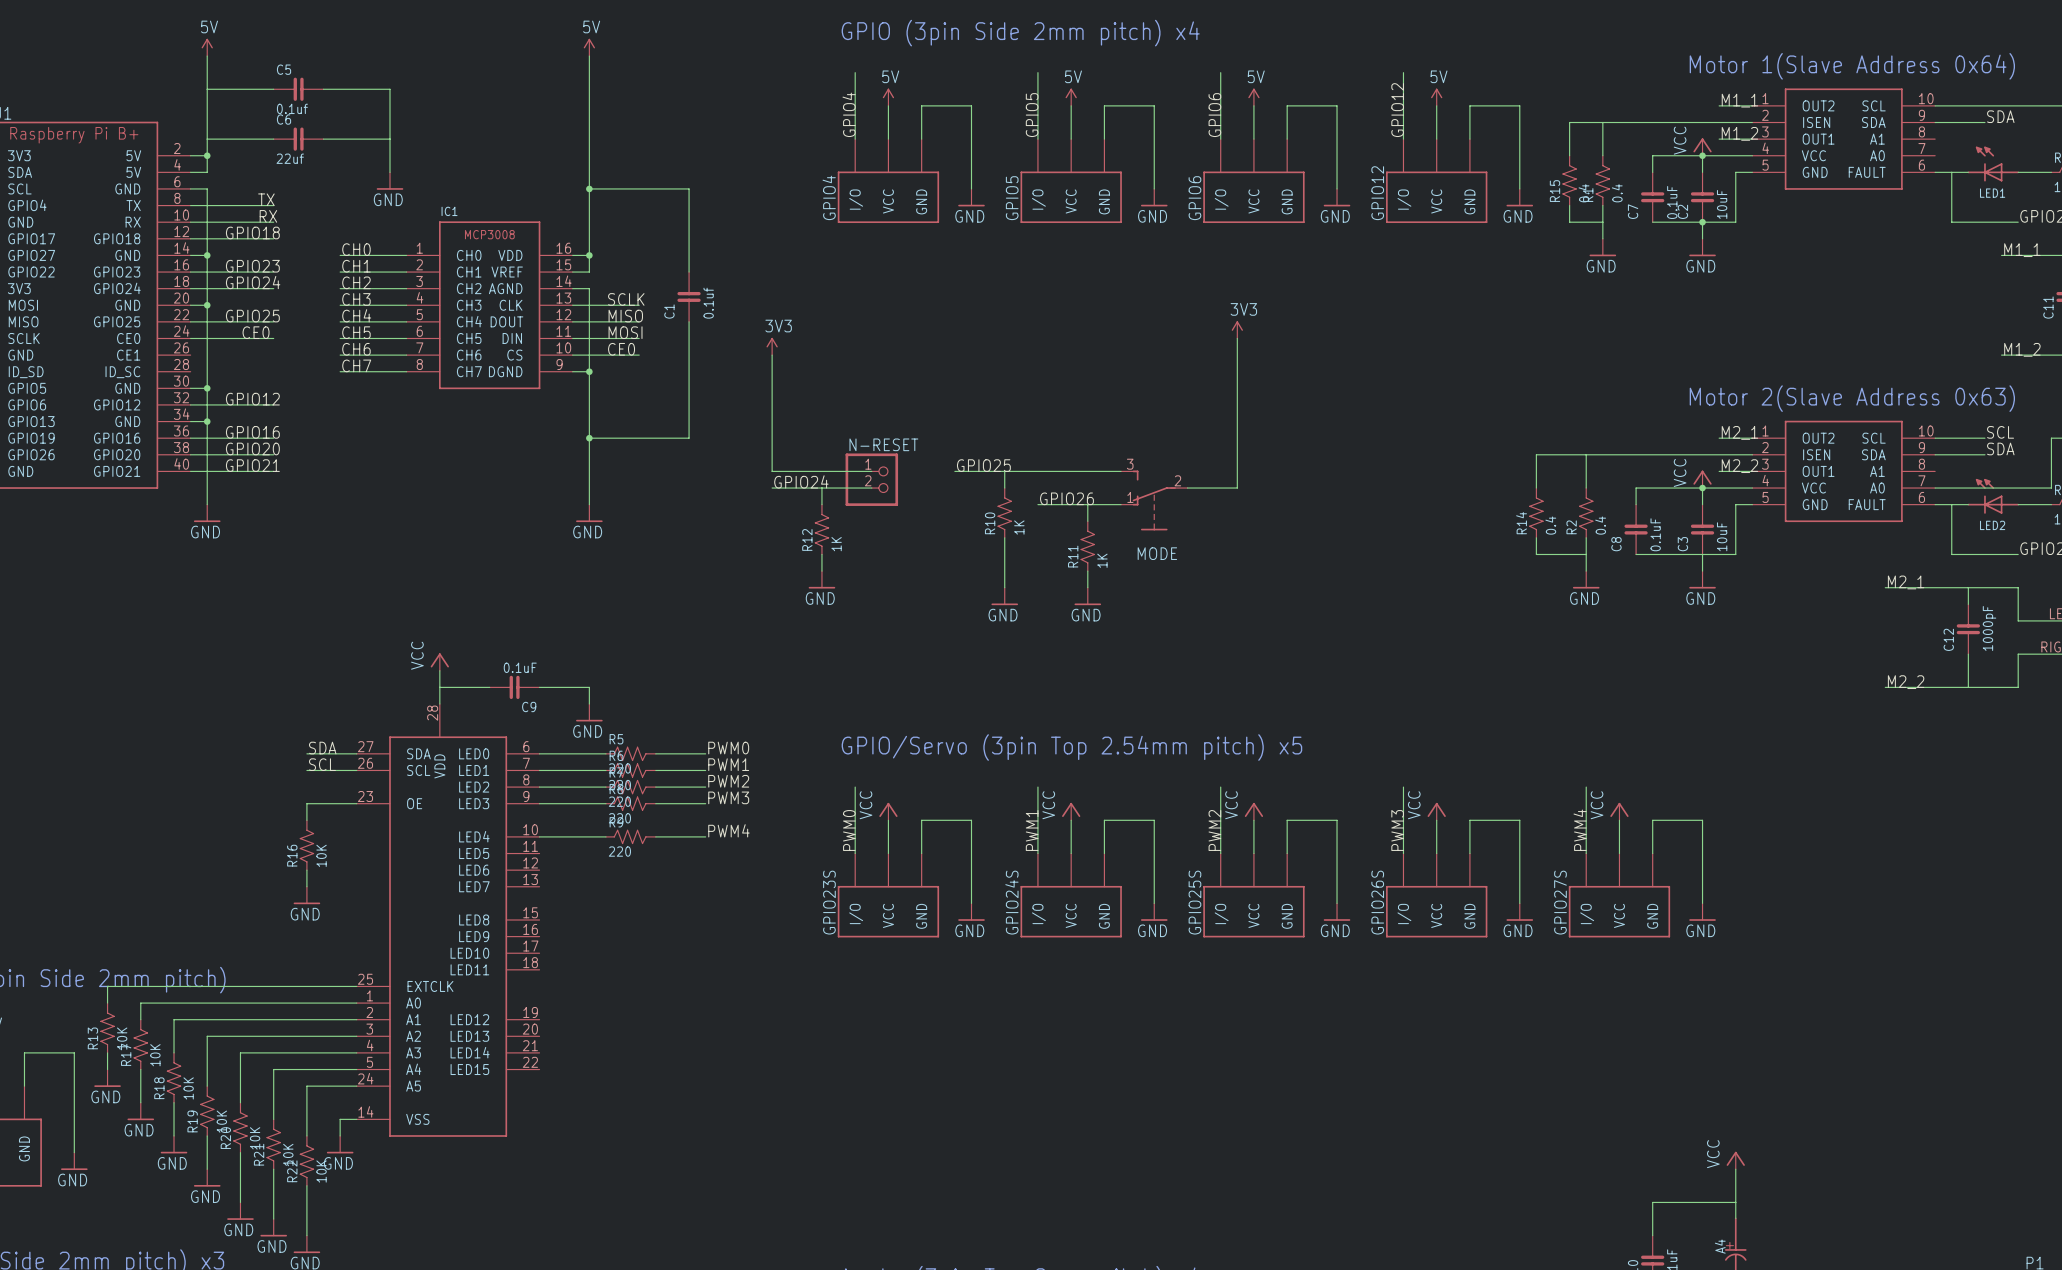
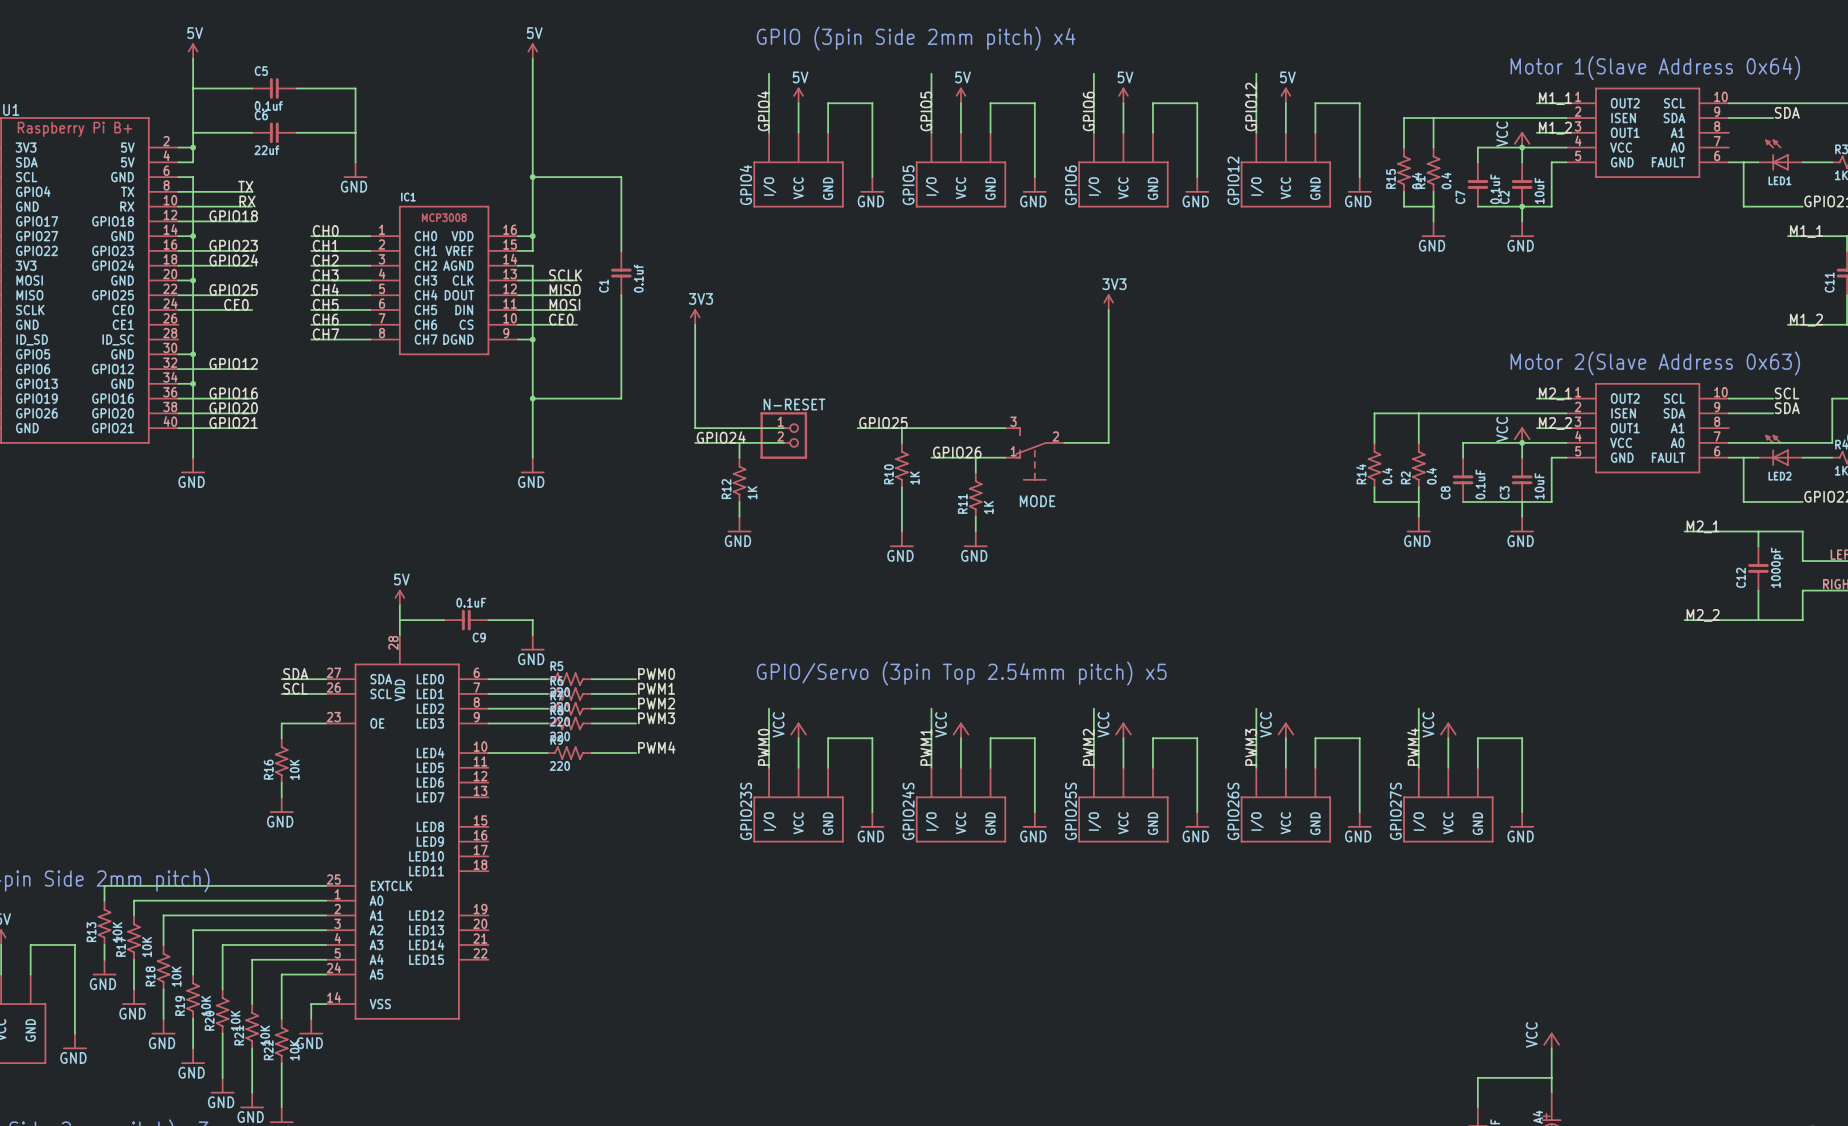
power symbol: VCC (439, 662) -> 5V (399, 597)

